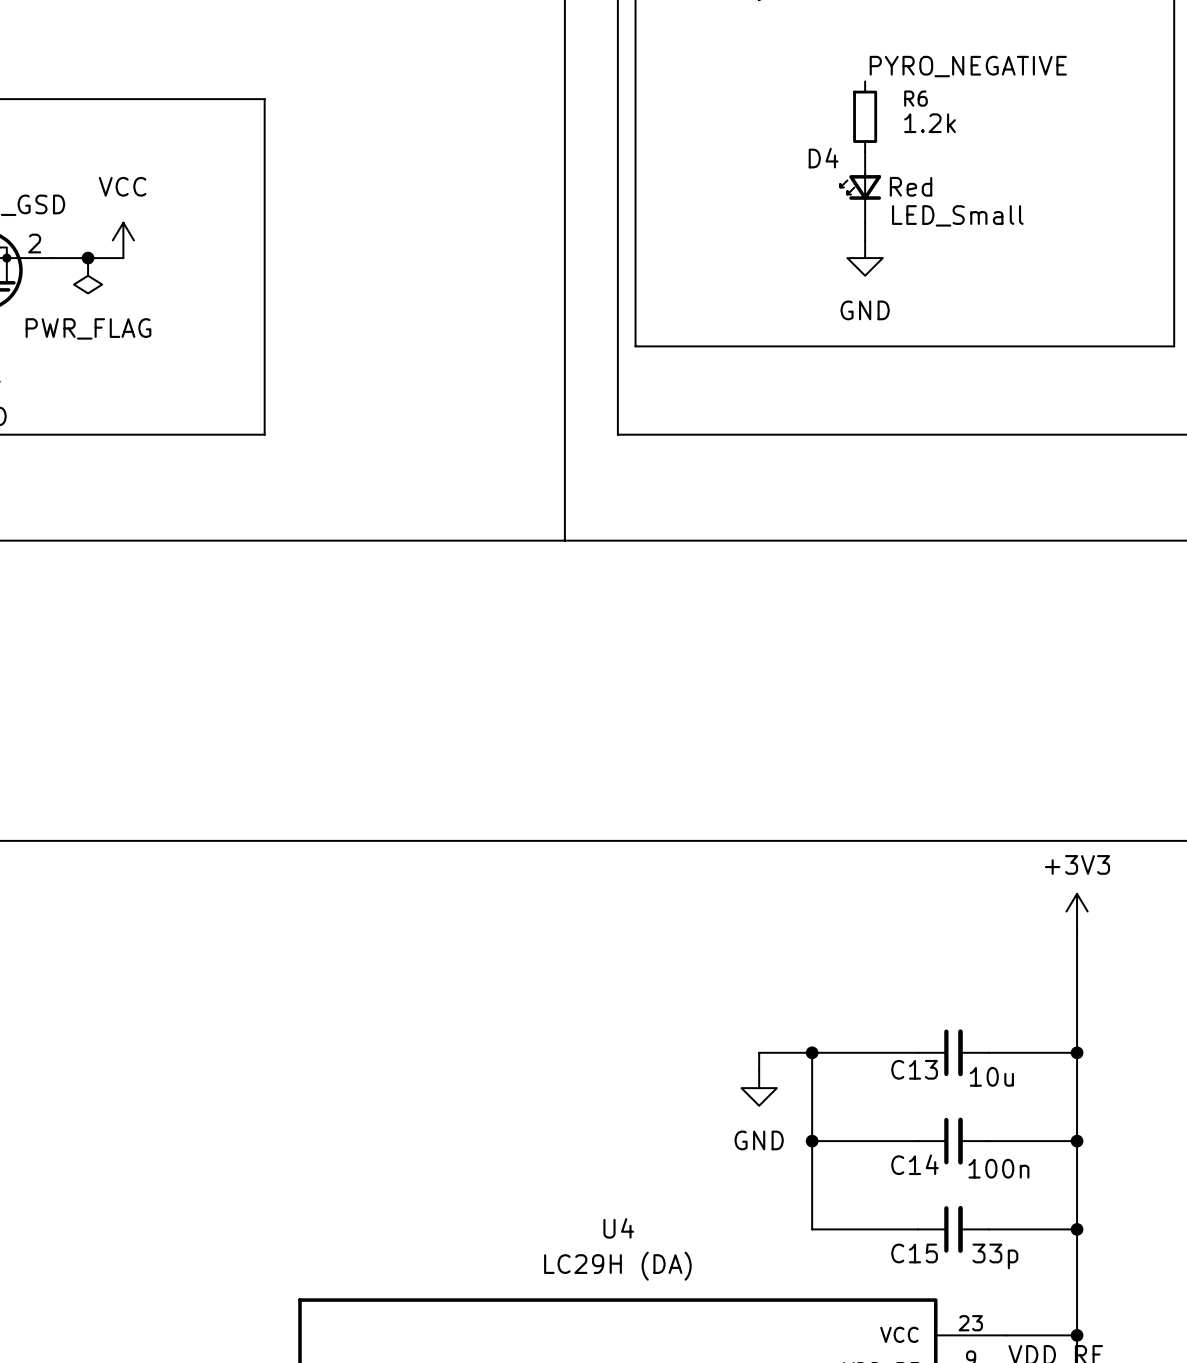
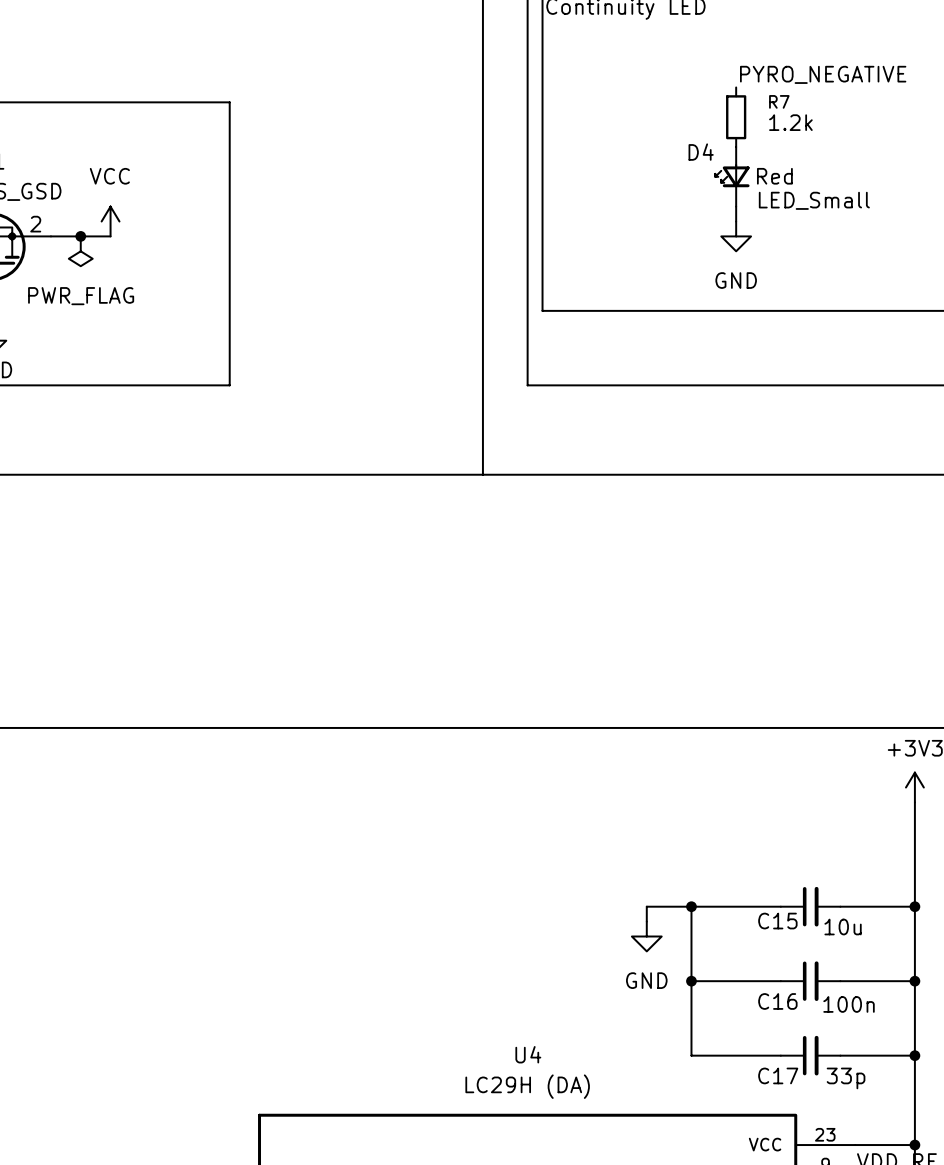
R6 name: R6 (915, 98) -> R7 (779, 101)
C13 name: C13 (914, 1069) -> C15 (777, 921)
C14 name: C14 (915, 1164) -> C16 (777, 1001)
C15 name: C15 (914, 1253) -> C17 (778, 1075)

